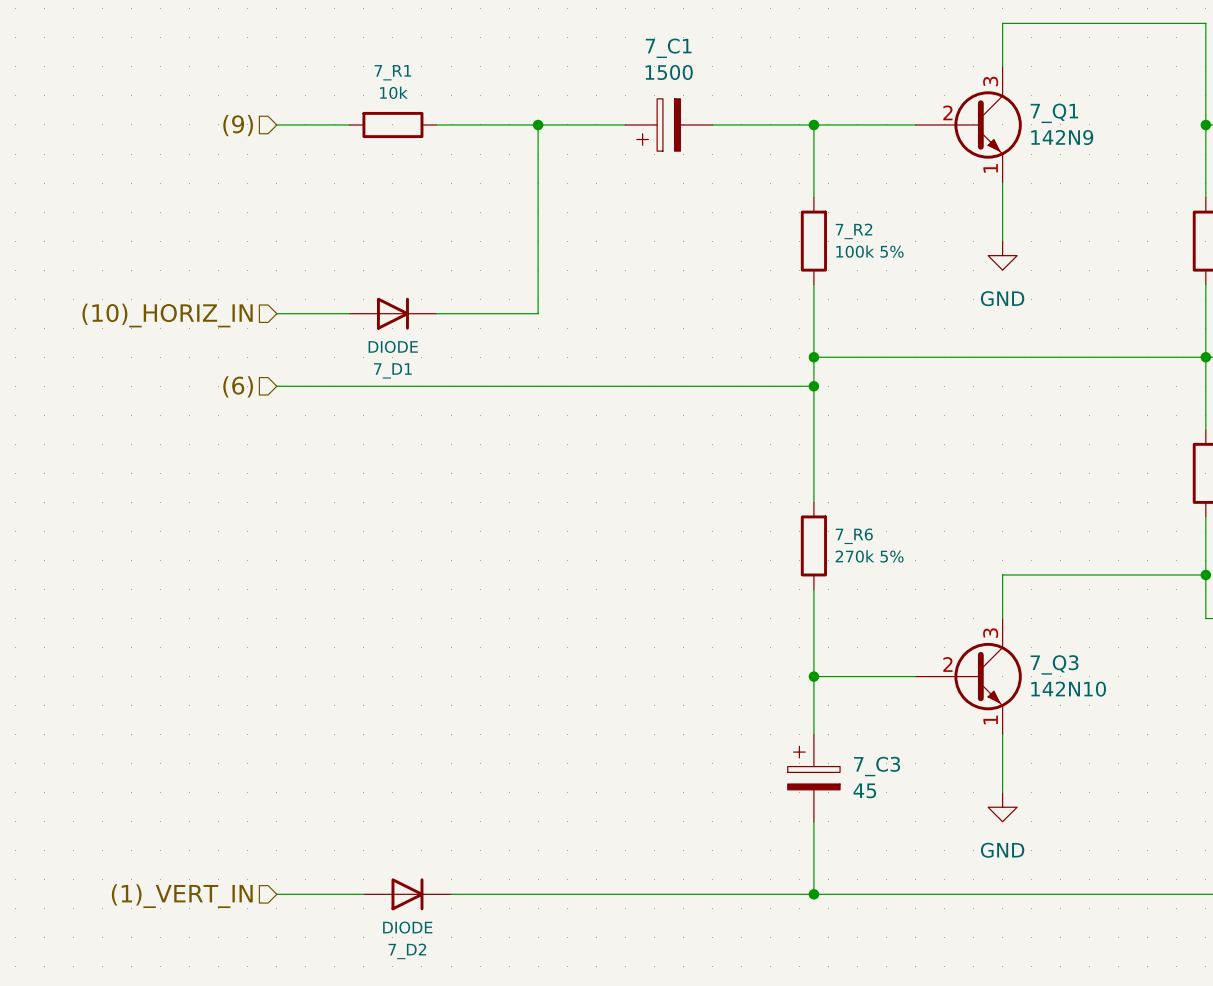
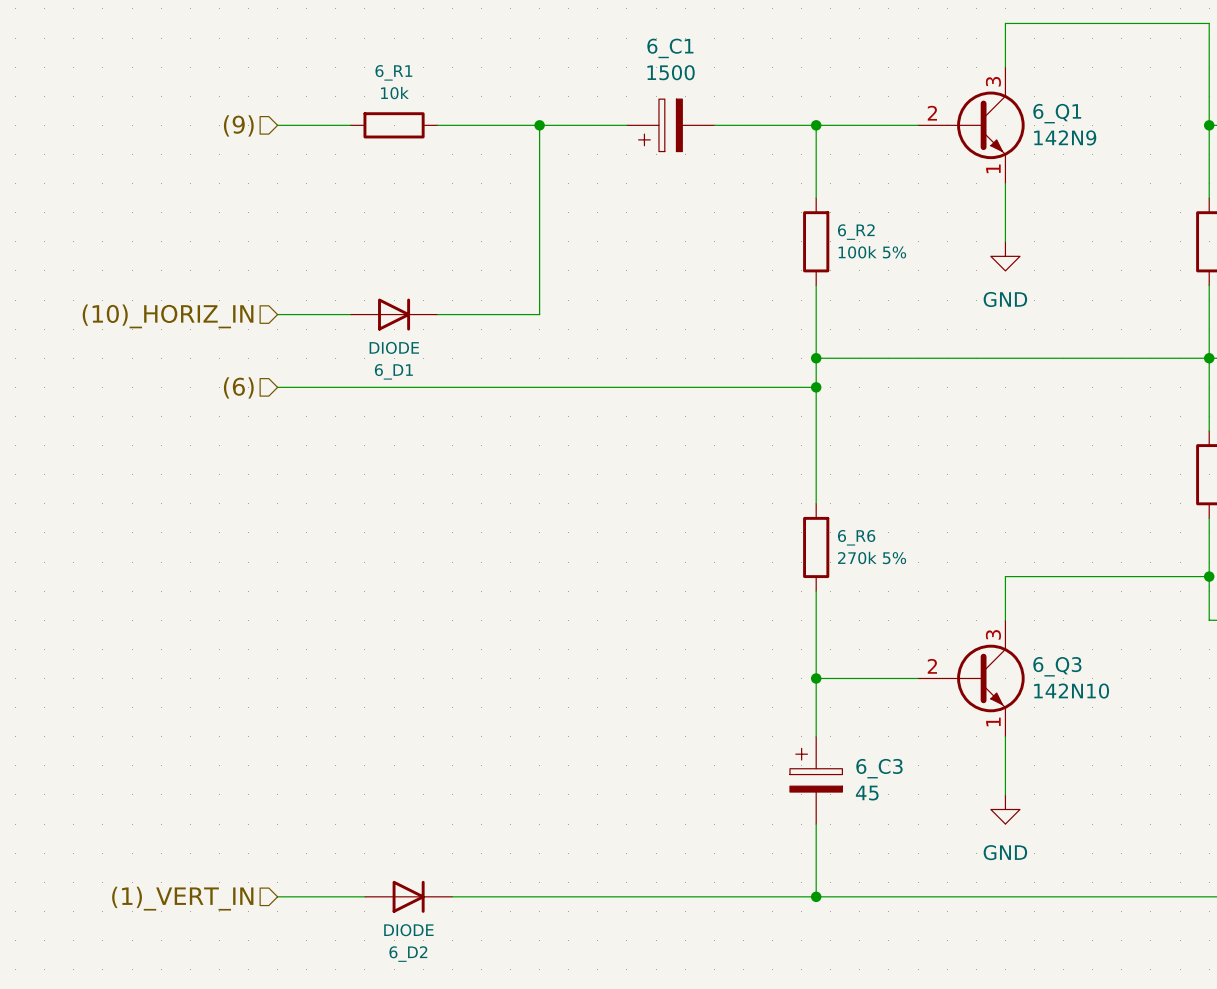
7_C1 name: 7_C1 (668, 48) -> 6_C1 (670, 48)
7_R1 name: 7_R1 (392, 72) -> 6_R1 (393, 72)
7_Q1: 142N9 (968, 124) -> none
6_Q1: none -> 142N9 (971, 125)
7_R2 name: 7_R2 (854, 231) -> 6_R2 (856, 232)
7_D1 name: 7_D1 (392, 370) -> 6_D1 (393, 371)
7_R6 name: 7_R6 (854, 536) -> 6_R6 (856, 537)
7_Q3: 142N10 (968, 676) -> none
6_Q3: none -> 142N10 (971, 678)
7_C3 name: 7_C3 (877, 766) -> 6_C3 (879, 768)
7_D2 name: 7_D2 (407, 951) -> 6_D2 (408, 954)

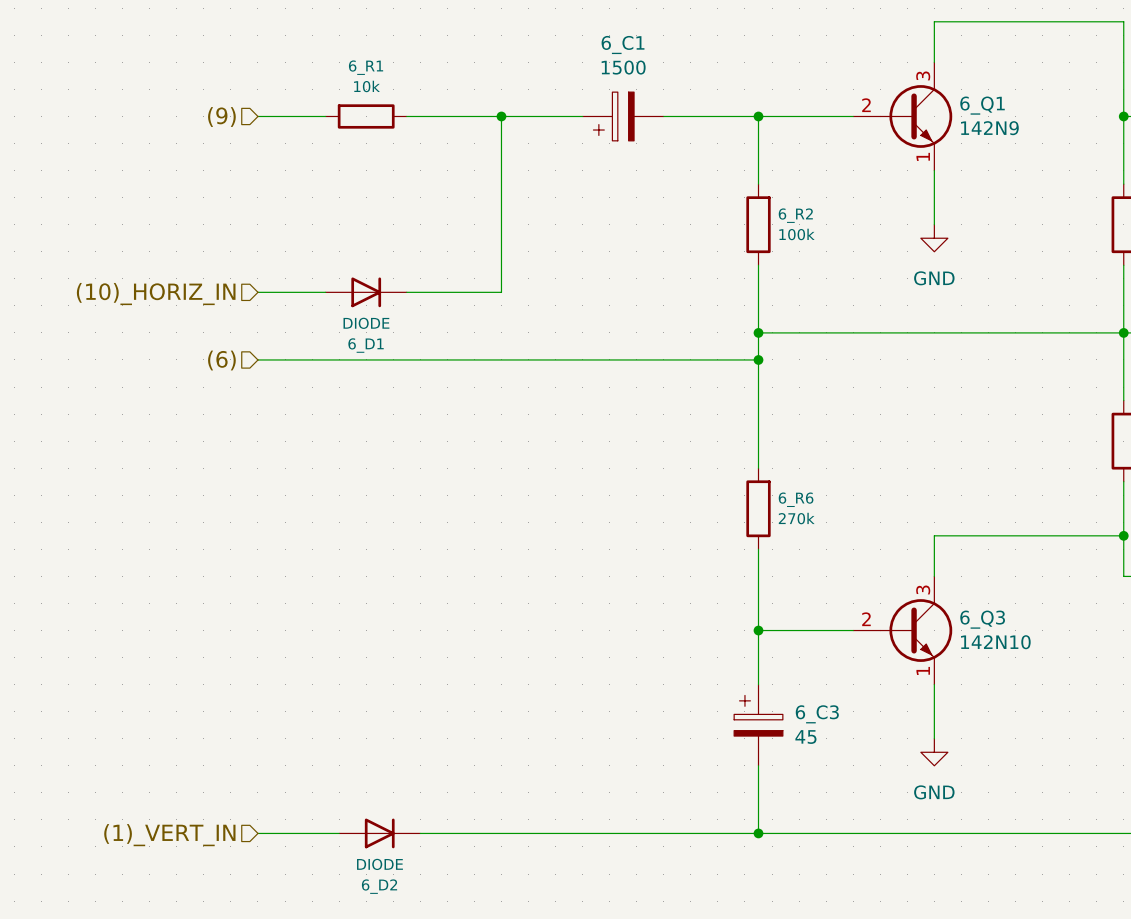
6_R2 value: 100k 5% (872, 252) -> 100k (796, 234)
6_R6 value: 270k 5% (872, 557) -> 270k (796, 518)

